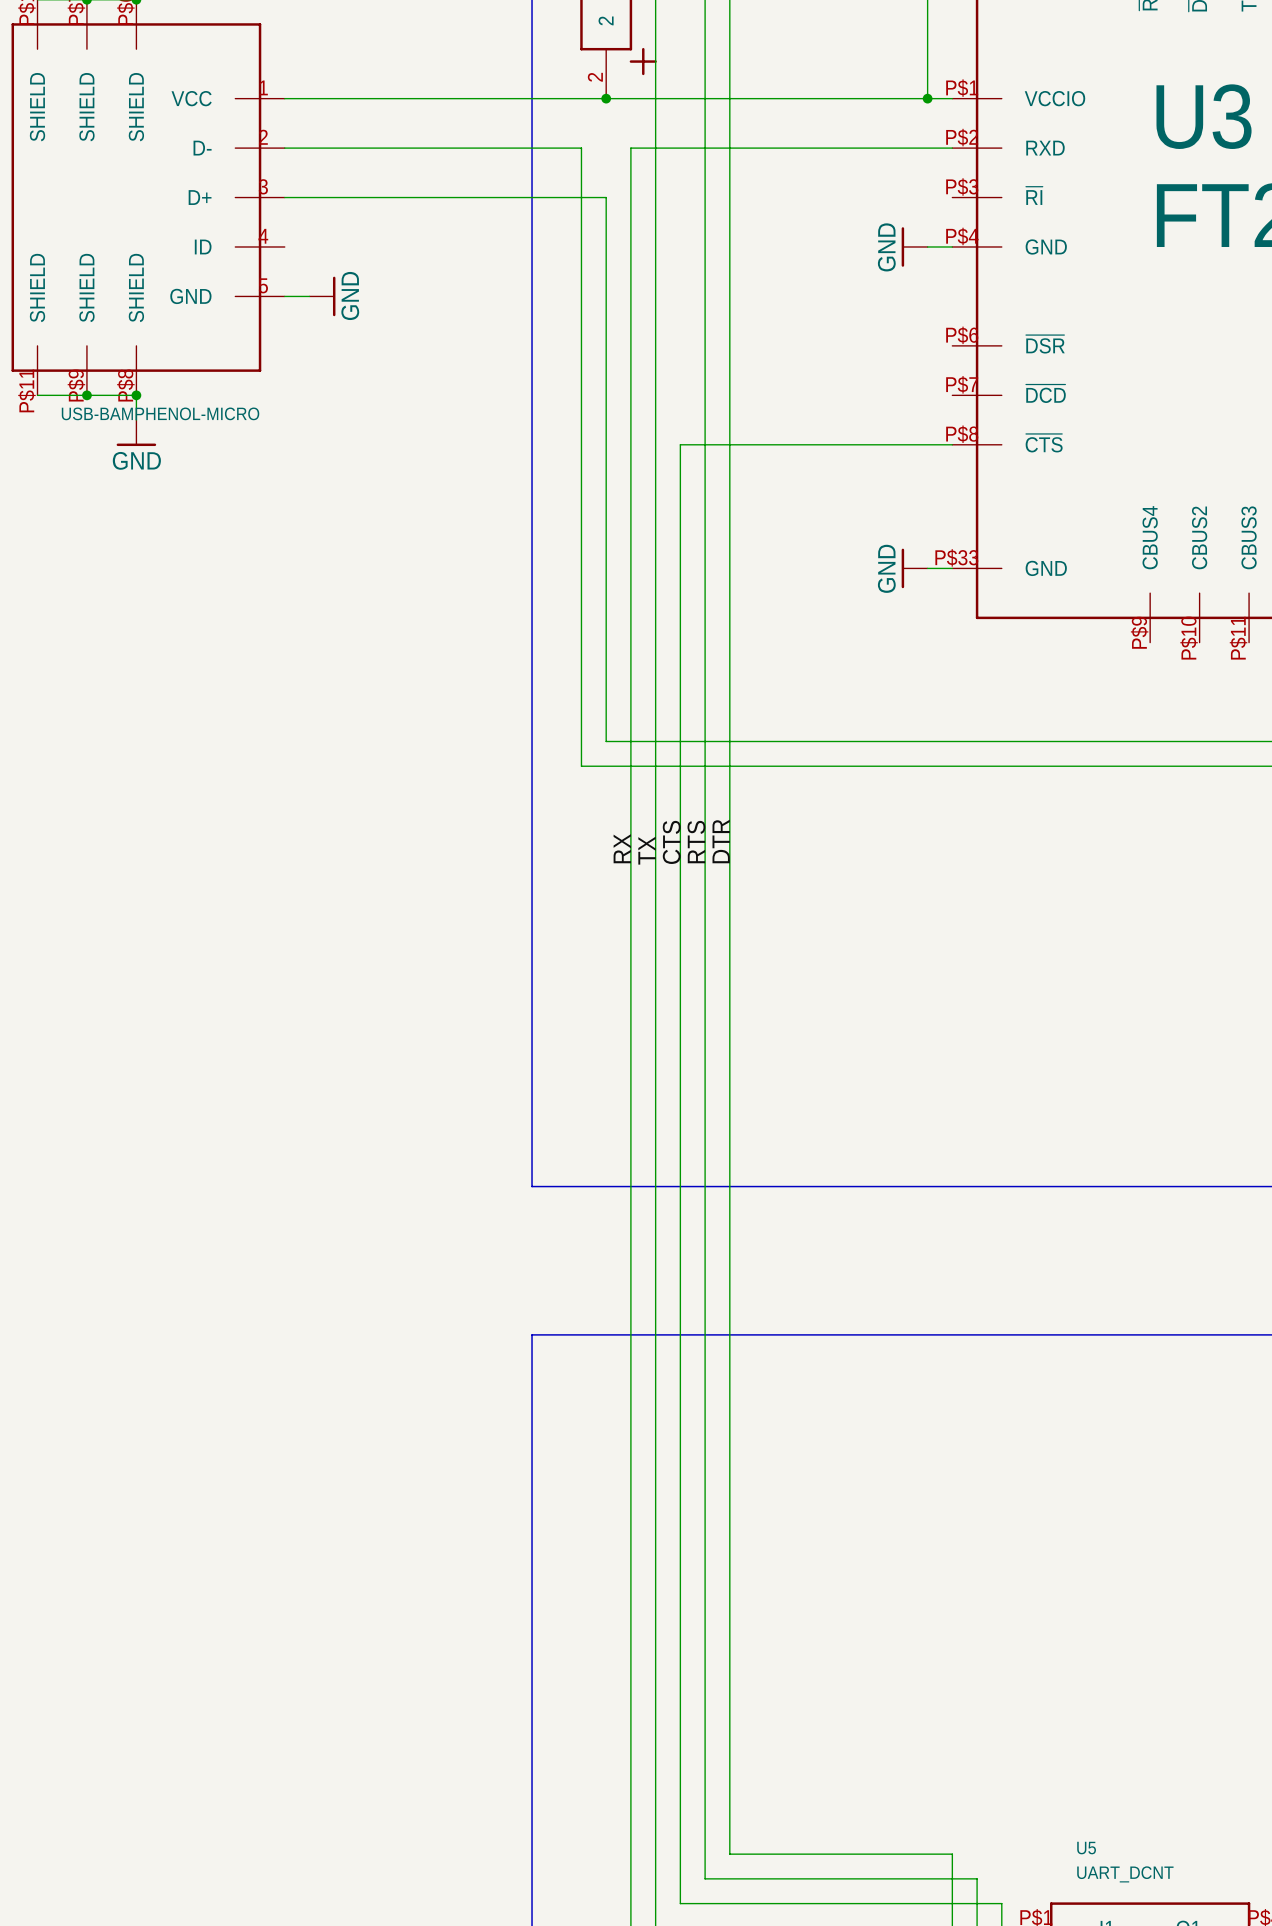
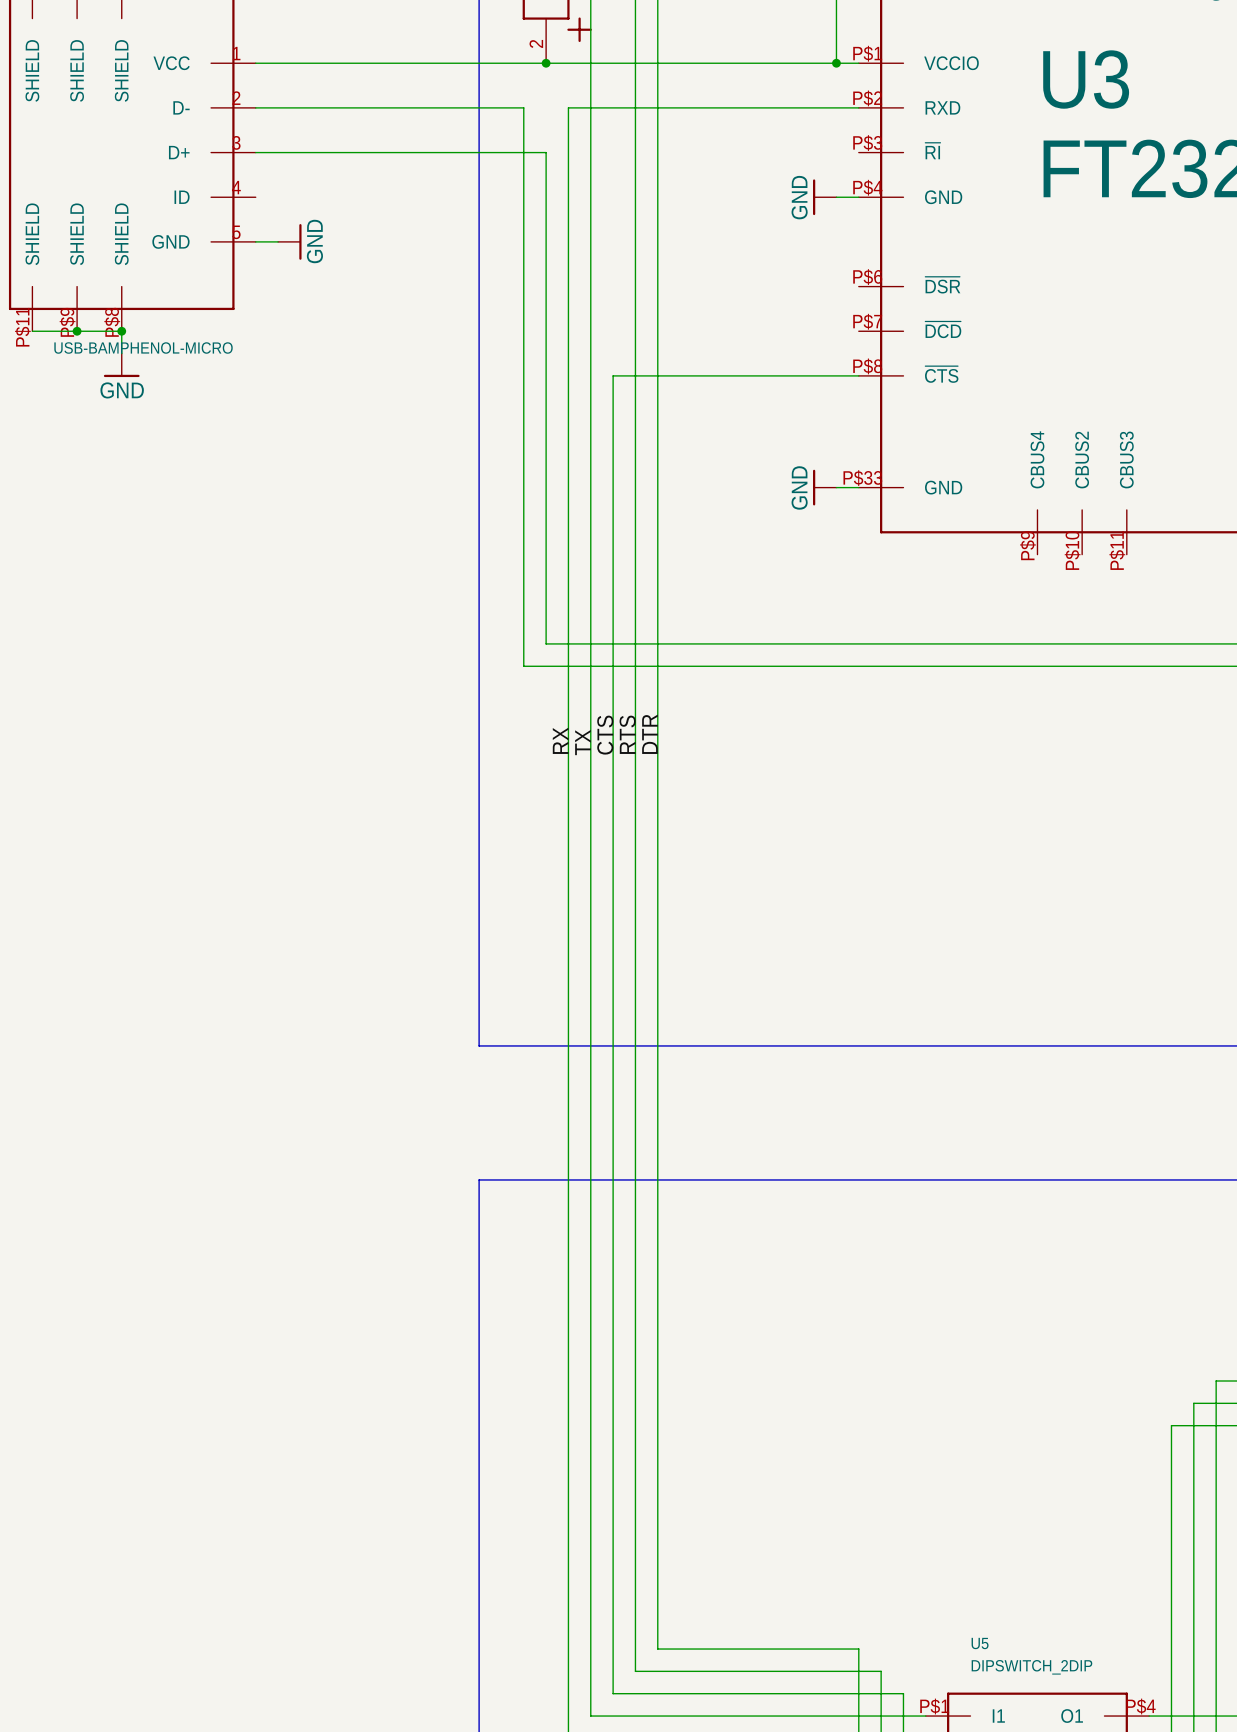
U5 value: UART_DCNT (1125, 1874) -> DIPSWITCH_2DIP (1031, 1667)

